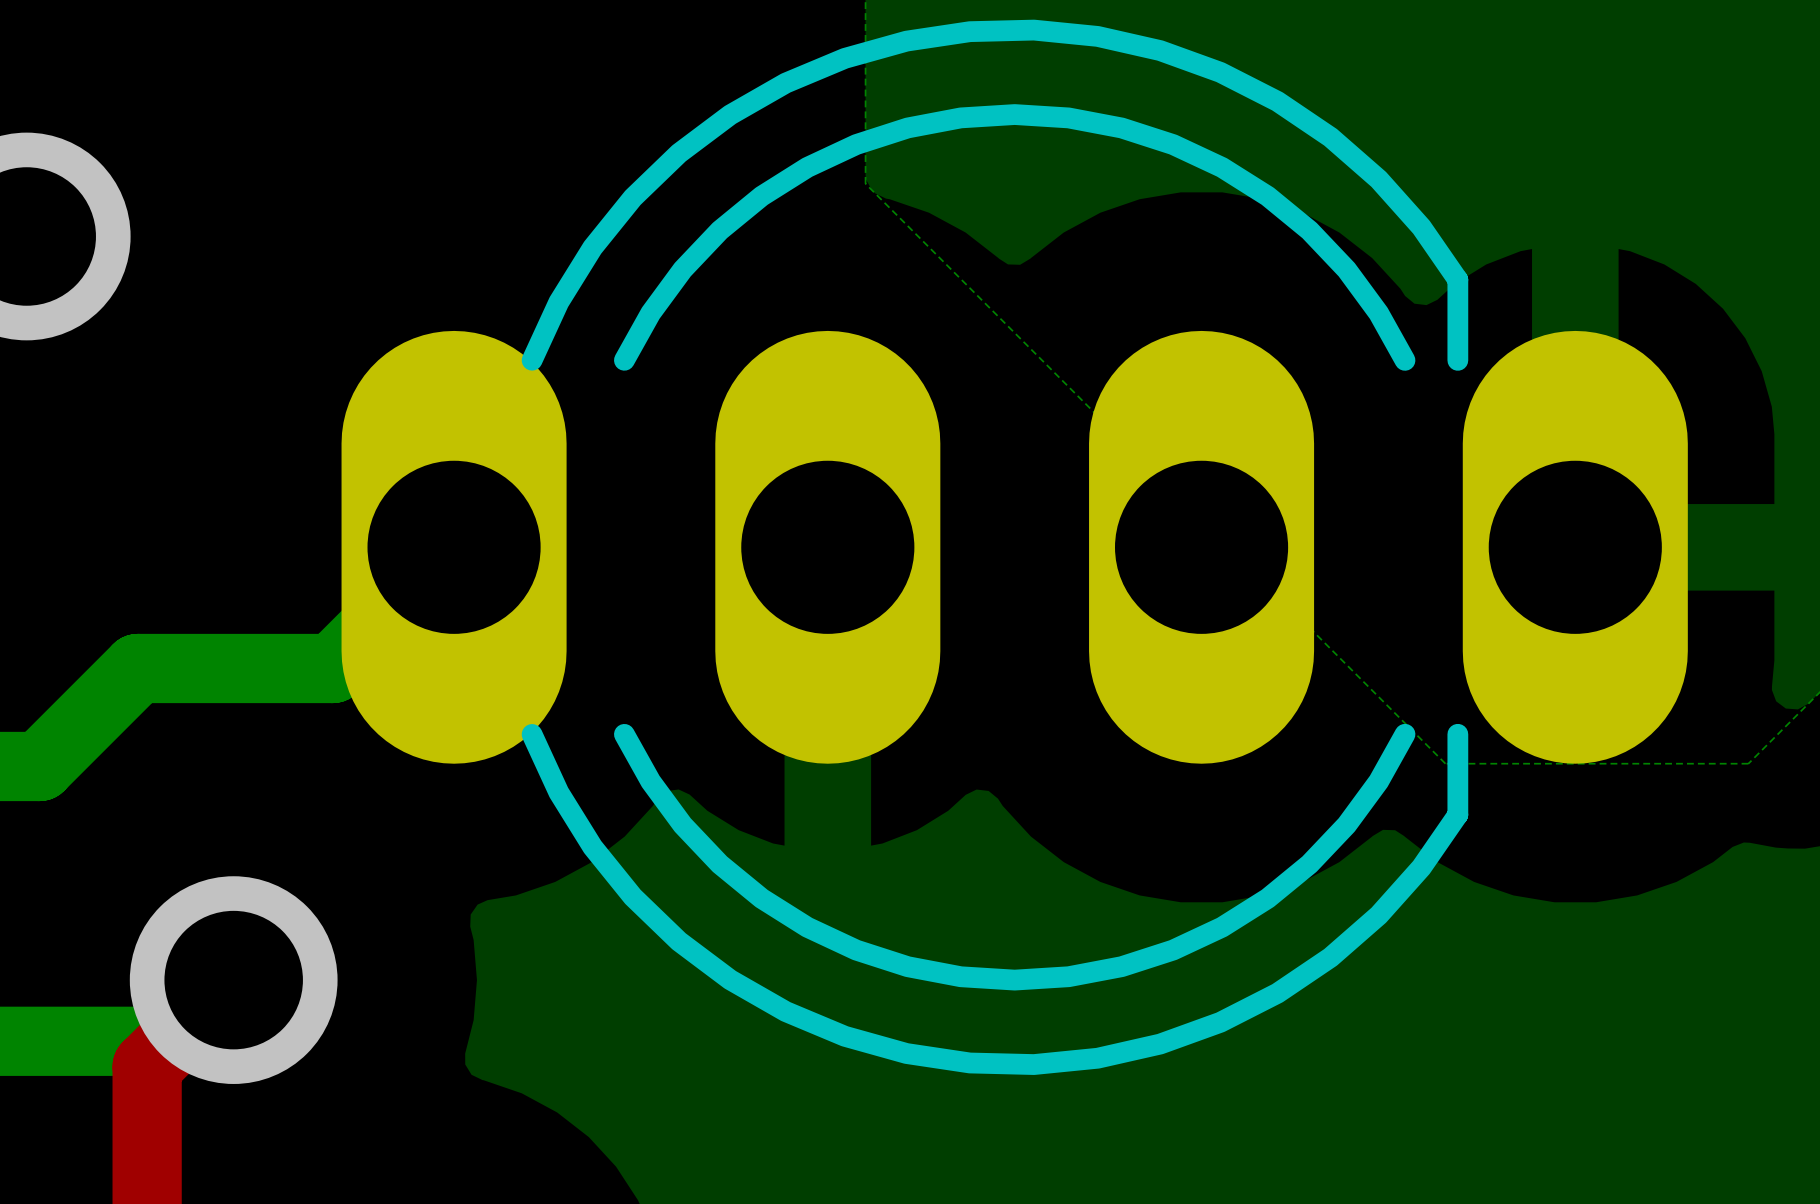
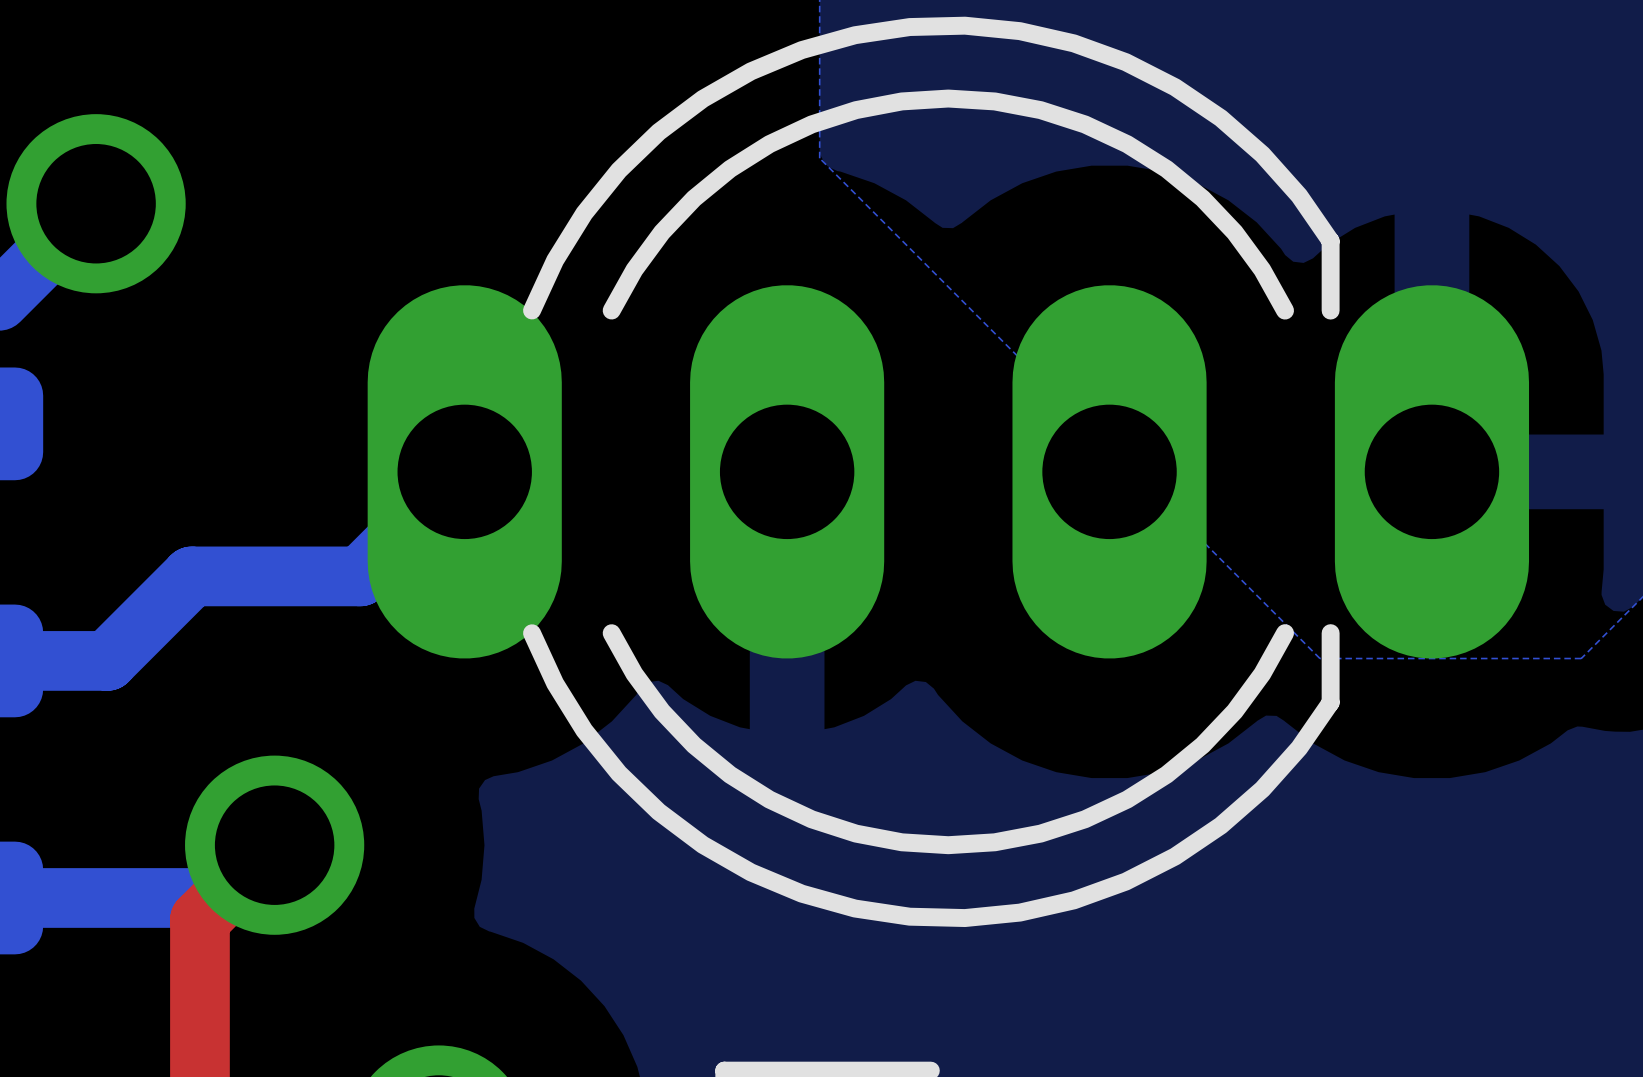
part footprint: [341, 19, 1688, 1075] -> [367, 16, 1530, 928]

